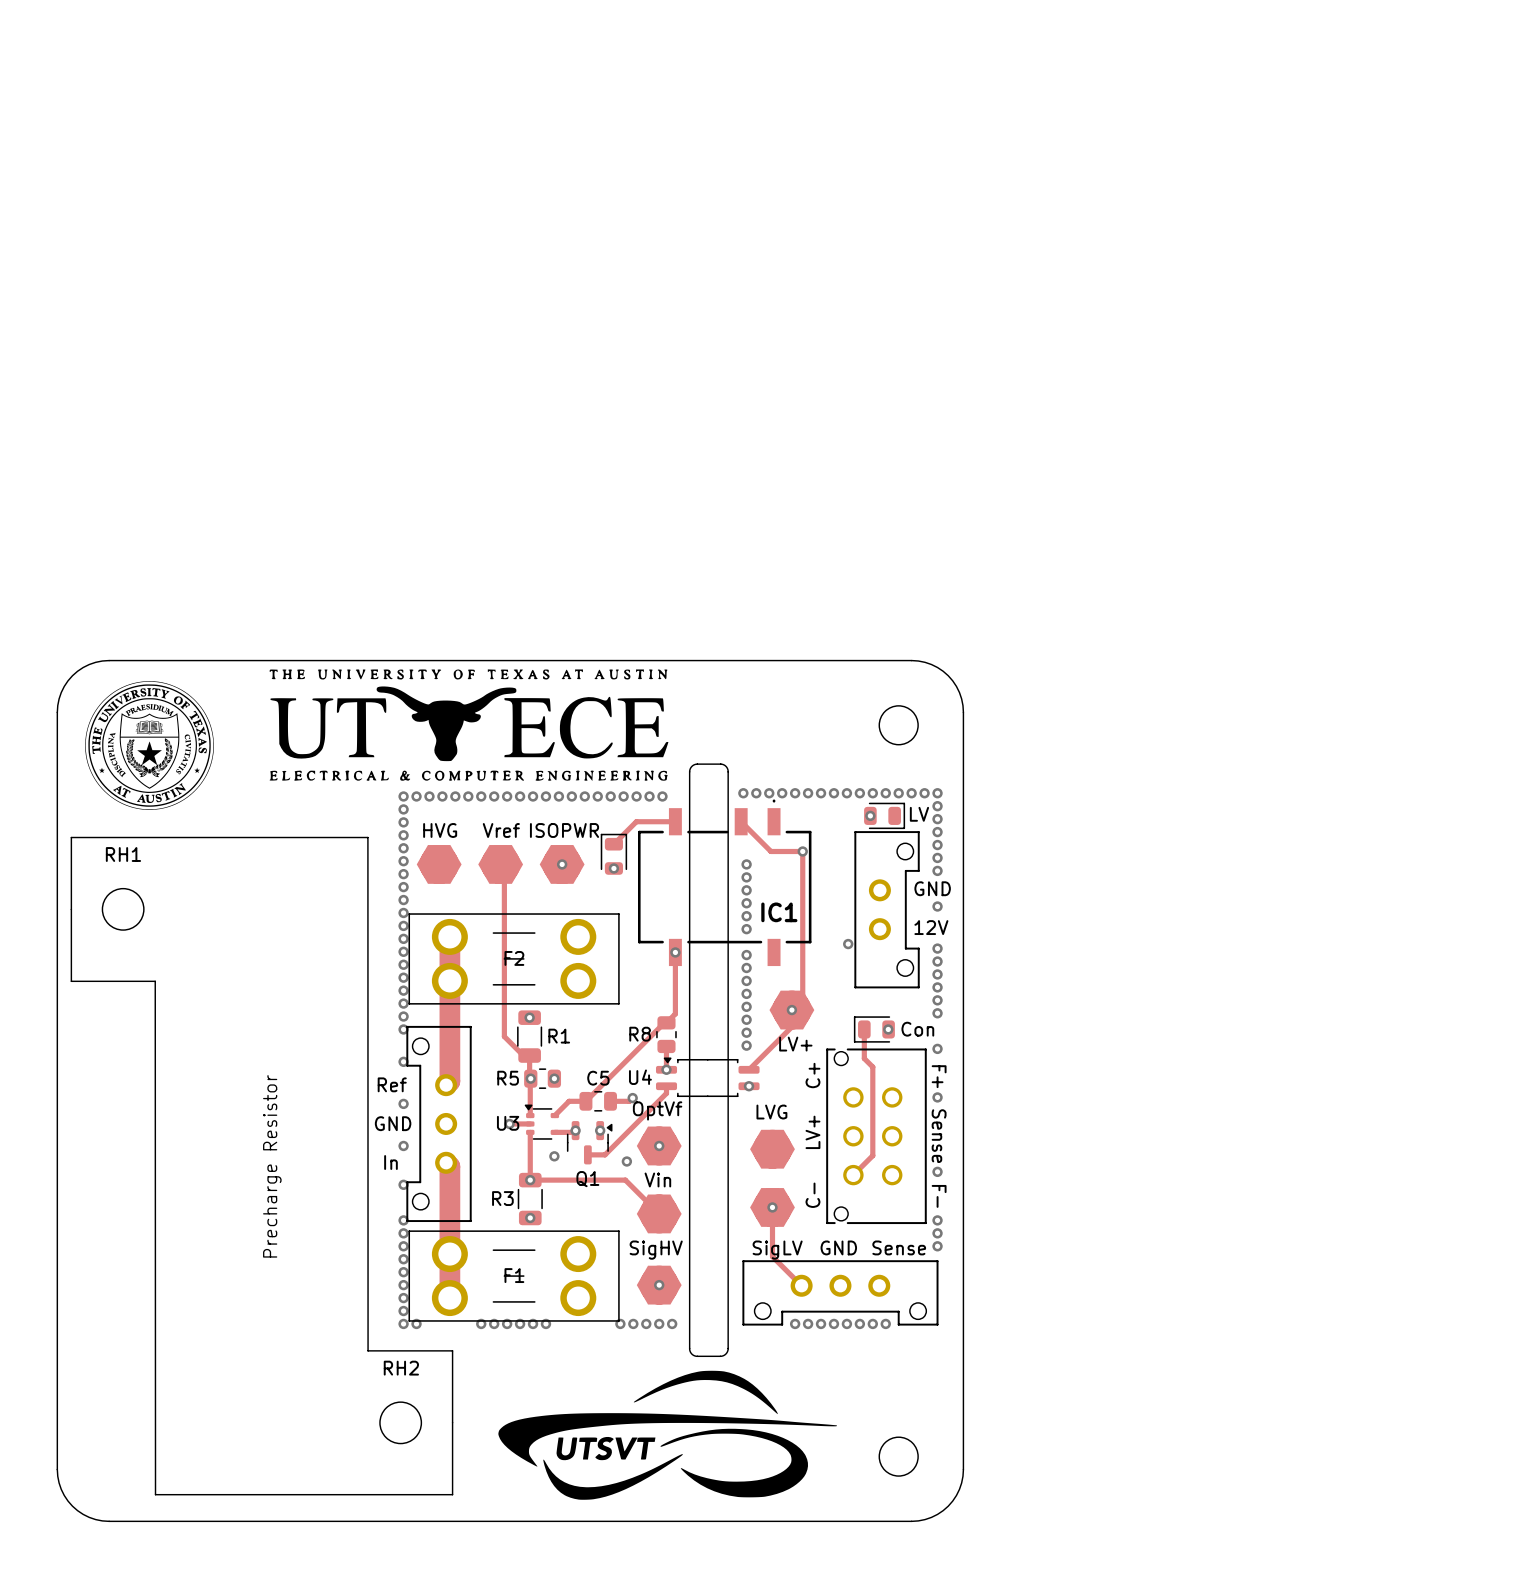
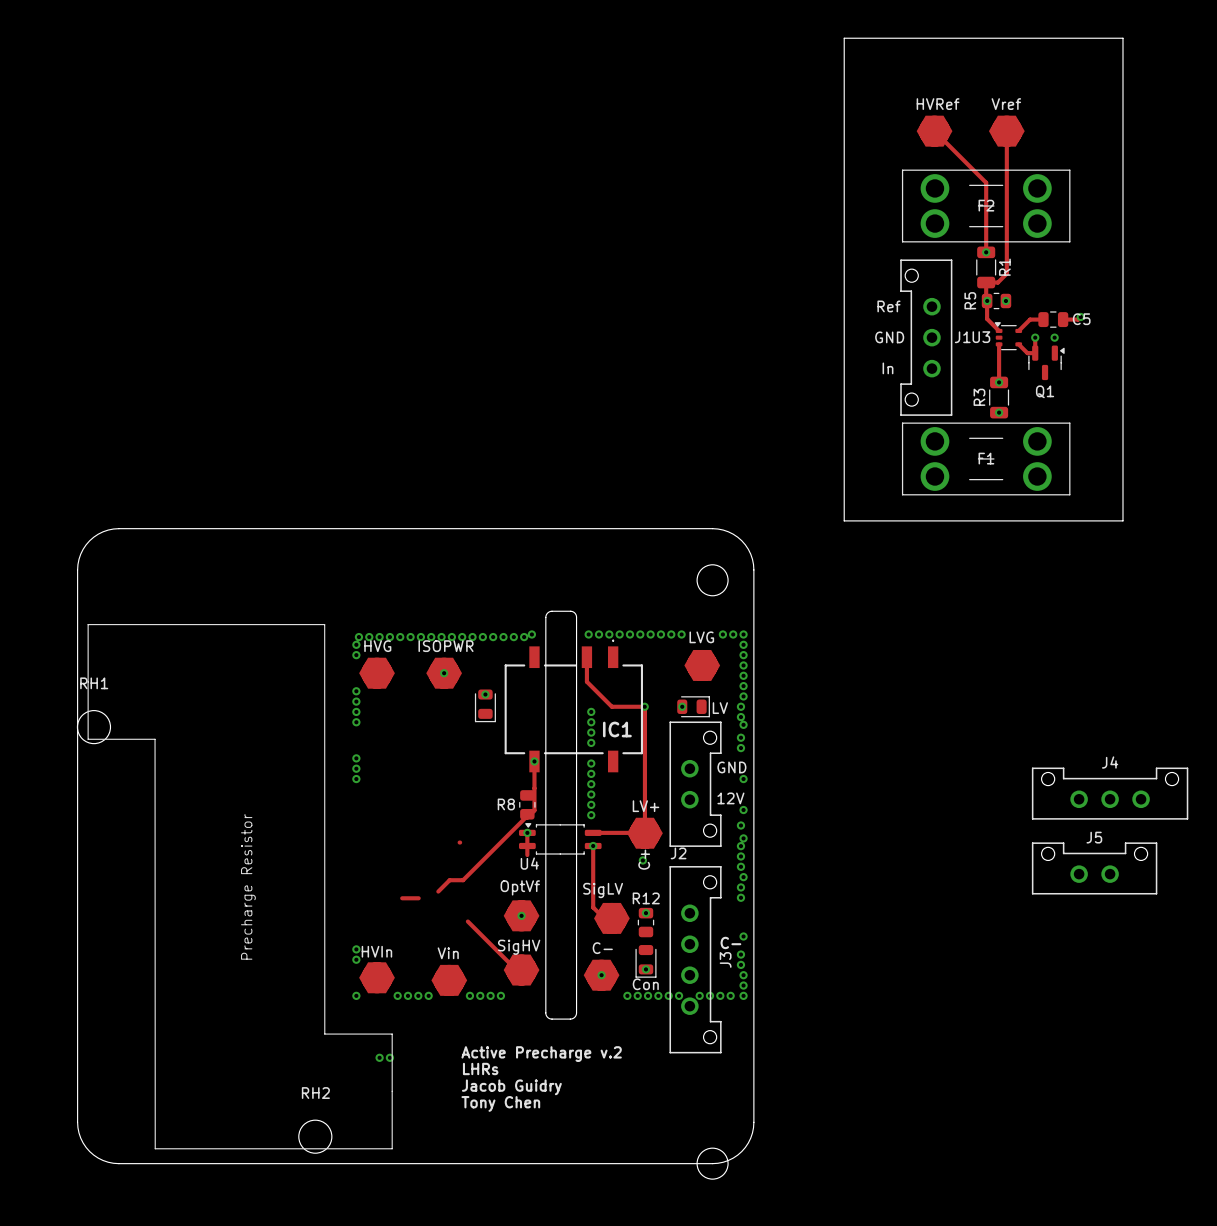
board edge: none -> (844, 38) (1122, 38) (1122, 520) (844, 520) (844, 38)
text: none -> HVRef (938, 104)
text: none -> Vref (1006, 104)
track: none -> (934, 131) (986, 182) (986, 252)
part: none -> (934, 131)
track: none -> (1006, 131) (1006, 273) (997, 282) (986, 282) (987, 300)
part: none -> (1006, 131)
via: none -> (986, 252)
track: none -> (987, 300) (987, 318) (999, 330)
via: none -> (987, 300)
via: none -> (1005, 300)
text: none -> Ref (888, 306)
track: none -> (1080, 317) (1078, 319) (1063, 319)
via: none -> (1080, 317)
track: none -> (1043, 319) (1030, 319) (1018, 330)
text: none -> GND (889, 337)
J1: none -> (926, 337)
track: none -> (1035, 337) (1035, 353) (1027, 353) (1018, 344)
via: none -> (1035, 337)
via: none -> (1054, 337)
track: none -> (999, 344) (999, 382)
text: none -> In (887, 368)
via: none -> (999, 382)
via: none -> (999, 412)
board edge: (154, 660) (102, 661) (83, 667) (72, 675) (64, 686) (59, 698) (57, 712) (57, 1469) (61, 1489) (72, 1506) (89, 1517) (109, 1521) (911, 1521) (931, 1517) (948, 1506) (959, 1489) (963, 1469) (963, 712) (961, 698) (956, 686) (943, 671) (925, 662) (898, 660) -> (118, 528) (103, 531) (89, 540) (80, 554) (77, 569) (77, 1127) (83, 1142) (93, 1155) (103, 1160) (118, 1163) (712, 1163) (728, 1160) (741, 1151) (750, 1138) (753, 1122) (753, 569) (750, 554) (741, 540) (728, 531) (712, 528)
drawing: [269, 669, 669, 781] -> none
drawing: [85, 681, 214, 810] -> none
via: none -> (531, 634)
via: (872, 793) -> none
via: (885, 793) -> none
via: (898, 793) -> none
via: (403, 796) -> none
via: (416, 796) -> none
via: (429, 796) -> none
via: (442, 796) -> none
text: none -> LVG (701, 637)
via: none -> (356, 644)
via: (403, 809) -> none
text position: LV (919, 814) -> LV (720, 708)
via: (870, 815) -> none
part position: (884, 815) -> (693, 706)
via: none -> (356, 655)
track: (675, 821) (636, 821) (613, 844) -> none
track: (741, 821) (770, 851) (802, 851) (802, 999) (791, 1010) (791, 1026) (749, 1069) -> (586, 657) (586, 681) (611, 706) (644, 707) (644, 833) (593, 832)
via: (403, 822) -> none
text position: HVG (440, 830) -> HVG (377, 646)
text: Vref (501, 830) -> none
text position: ISOPWR (564, 830) -> ISOPWR (446, 646)
part: none -> (702, 665)
via: (403, 835) -> none
line: (71, 837) (367, 837) (368, 1350) (452, 1350) (452, 1494) (155, 1494) (155, 981) (71, 981) (71, 837) -> (88, 624) (324, 624) (324, 1034) (392, 1034) (392, 1148) (155, 1148) (155, 739) (88, 739) (88, 624)
part: none -> (377, 673)
via: (403, 848) -> none
via: (802, 851) -> none
part rotation: 0° (613, 854) -> 180° (485, 705)
part position: (613, 854) -> (485, 705)
via: (403, 861) -> none
part: (439, 864) -> none
via: none -> (356, 691)
track: (500, 864) (504, 868) (504, 1036) (523, 1055) (529, 1055) (530, 1115) -> none
part: (500, 864) -> none
part position: (562, 864) -> (444, 673)
via position: (562, 864) -> (444, 673)
via: (746, 864) -> none
via: (403, 874) -> none
via: none -> (356, 701)
via: (746, 877) -> none
via: none -> (644, 706)
via: none -> (682, 706)
via: none -> (740, 706)
via: (403, 887) -> none
text position: GND (932, 888) -> GND (731, 767)
via: none -> (356, 711)
via: none -> (740, 717)
via: (403, 900) -> none
via: none -> (356, 722)
part position: (887, 909) -> (695, 784)
via: (403, 912) -> none
via: none -> (740, 737)
via: (403, 925) -> none
text position: 12V (931, 927) -> 12V (730, 798)
via: none -> (740, 748)
track: (449, 936) (449, 1081) (446, 1085) -> none
via: (403, 938) -> none
via: (848, 944) -> none
via: none -> (356, 758)
via: (937, 948) -> none
via: (403, 951) -> none
F2 position: (514, 958) -> (986, 206)
via: none -> (356, 768)
via: (937, 961) -> none
via: (403, 964) -> none
via: none -> (356, 779)
via: (403, 977) -> none
via: (937, 987) -> none
via: (403, 990) -> none
J4: none -> (1110, 793)
via: (937, 1000) -> none
via: (403, 1003) -> none
part position: (791, 1010) -> (644, 833)
via: (791, 1010) -> none
via: (403, 1016) -> none
via: (529, 1017) -> none
via: (403, 1029) -> none
track: (864, 1029) (864, 1058) (872, 1067) (872, 1155) (853, 1175) -> none
part: (874, 1029) -> none
via: (888, 1029) -> none
text position: Con (917, 1029) -> Con (645, 984)
via: (746, 1032) -> none
via: none -> (740, 825)
R8 position: (666, 1034) -> (527, 804)
R1 position: (529, 1036) -> (986, 267)
R1 name rotation: 0° (559, 1036) -> 90° counterclockwise (1004, 267)
text position: LV+ (795, 1044) -> LV+ (645, 806)
via: (746, 1045) -> none
track: none -> (459, 842) (460, 842)
track: none -> (593, 845) (593, 907) (601, 915)
via: none -> (593, 845)
via: none -> (740, 846)
via: (403, 1061) -> none
text: none -> J2 (678, 853)
via position: (666, 1069) -> (527, 832)
via: none -> (740, 856)
via: none -> (642, 860)
text: F+ (939, 1076) -> none
U4 name position: U4 (640, 1077) -> U4 (529, 863)
U4 position: (707, 1077) -> (560, 838)
R5 name rotation: 0° (508, 1078) -> 90° counterclockwise (970, 300)
via: (530, 1078) -> none
R5 position: (542, 1078) -> (996, 300)
via: (554, 1078) -> none
C5 name position: C5 (598, 1078) -> C5 (1081, 319)
text: Ref (392, 1084) -> none
via: none -> (740, 866)
track: (666, 1086) (666, 1093) (605, 1154) (587, 1154) -> none
via: (749, 1086) -> none
J5: none -> (1094, 868)
track: (632, 1098) (629, 1101) (610, 1101) -> none
via: (632, 1098) -> none
C5 position: (598, 1101) -> (1053, 319)
via: (403, 1103) -> none
via: none -> (740, 887)
text: LVG (771, 1112) -> none
U3 position: (541, 1122) -> (1008, 336)
text: GND (393, 1123) -> none
part: (439, 1123) -> none
via: (509, 1123) -> none
via: none -> (740, 897)
track: (575, 1130) (573, 1132) (554, 1132) -> none
via: (575, 1130) -> none
via: (600, 1130) -> none
track: (530, 1132) (530, 1180) (625, 1180) (659, 1213) -> none
text: LV+ (812, 1132) -> none
part: (876, 1136) -> none
text: Sense (939, 1136) -> none
Q1 position: (589, 1142) -> (1046, 362)
via: none -> (645, 913)
via: (403, 1145) -> none
track: none -> (467, 921) (521, 975)
R12: none -> (645, 922)
via: (554, 1156) -> none
via: (626, 1161) -> none
text: In (390, 1162) -> none
track: (446, 1162) (449, 1166) (449, 1298) -> none
text position: Precharge Resistor (272, 1166) -> Precharge Resistor (248, 886)
text position: Vin (657, 1179) -> Vin (448, 953)
text: none -> C- (730, 942)
via: (530, 1180) -> none
via: (403, 1184) -> none
text: none -> C- (602, 948)
via: none -> (356, 949)
text: none -> HVIn (376, 951)
via: none -> (740, 954)
text: C- (812, 1195) -> none
text: F- (939, 1196) -> none
R3 name rotation: 0° (502, 1198) -> 90° counterclockwise (979, 397)
R3 position: (530, 1199) -> (999, 397)
via: none -> (356, 959)
J3: none -> (695, 959)
part: none -> (645, 961)
track: (772, 1207) (772, 1256) (801, 1285) -> none
part position: (772, 1207) -> (601, 975)
via position: (772, 1207) -> (601, 975)
via: none -> (740, 964)
via: none -> (645, 969)
via: (530, 1217) -> none
via: (403, 1220) -> none
part: none -> (377, 977)
part: none -> (449, 980)
via: (403, 1233) -> none
via: (403, 1246) -> none
via: none -> (356, 995)
via: none -> (397, 995)
via: none -> (407, 995)
via: none -> (418, 995)
via: none -> (428, 995)
via: none -> (469, 995)
via: none -> (480, 995)
via: none -> (490, 995)
via: none -> (500, 995)
via: none -> (627, 995)
via: none -> (637, 995)
via: none -> (648, 995)
via: none -> (658, 995)
via: none -> (668, 995)
via: none -> (679, 995)
via: none -> (699, 995)
via: none -> (710, 995)
via: none -> (720, 995)
via: none -> (730, 995)
text: GND (838, 1247) -> none
text: Sense (899, 1247) -> none
text position: SigHV (656, 1250) -> SigHV (519, 947)
text position: SigLV (777, 1250) -> SigLV (603, 890)
via: (403, 1259) -> none
board edge: (689, 1267) (689, 1349) (691, 1354) (697, 1356) (721, 1356) (727, 1351) (728, 1267) -> (545, 1012) (547, 1017) (552, 1019) (571, 1018) (576, 1012)
via: (403, 1272) -> none
F1 position: (514, 1276) -> (986, 458)
via: (403, 1285) -> none
part: (659, 1285) -> none
via: (659, 1285) -> none
part: (840, 1292) -> none
via: (403, 1298) -> none
via: (403, 1311) -> none
text: none -> Active Precharge v.2 (541, 1054)
via: (403, 1323) -> none
via: (416, 1323) -> none
via: (507, 1323) -> none
via: (520, 1323) -> none
via: (533, 1323) -> none
via: (545, 1323) -> none
via: (620, 1323) -> none
via: (633, 1323) -> none
via: (646, 1323) -> none
via: (659, 1323) -> none
via: (672, 1323) -> none
via: (795, 1323) -> none
via: (808, 1323) -> none
via: (821, 1323) -> none
via: (833, 1323) -> none
via: (846, 1323) -> none
via: (859, 1323) -> none
via: (872, 1323) -> none
via: (885, 1323) -> none
text: none -> LHRs (480, 1068)
text: none -> Jacob Guidry (511, 1087)
drawing: [498, 1370, 837, 1500] -> none
text: none -> Tony Chen (500, 1103)

